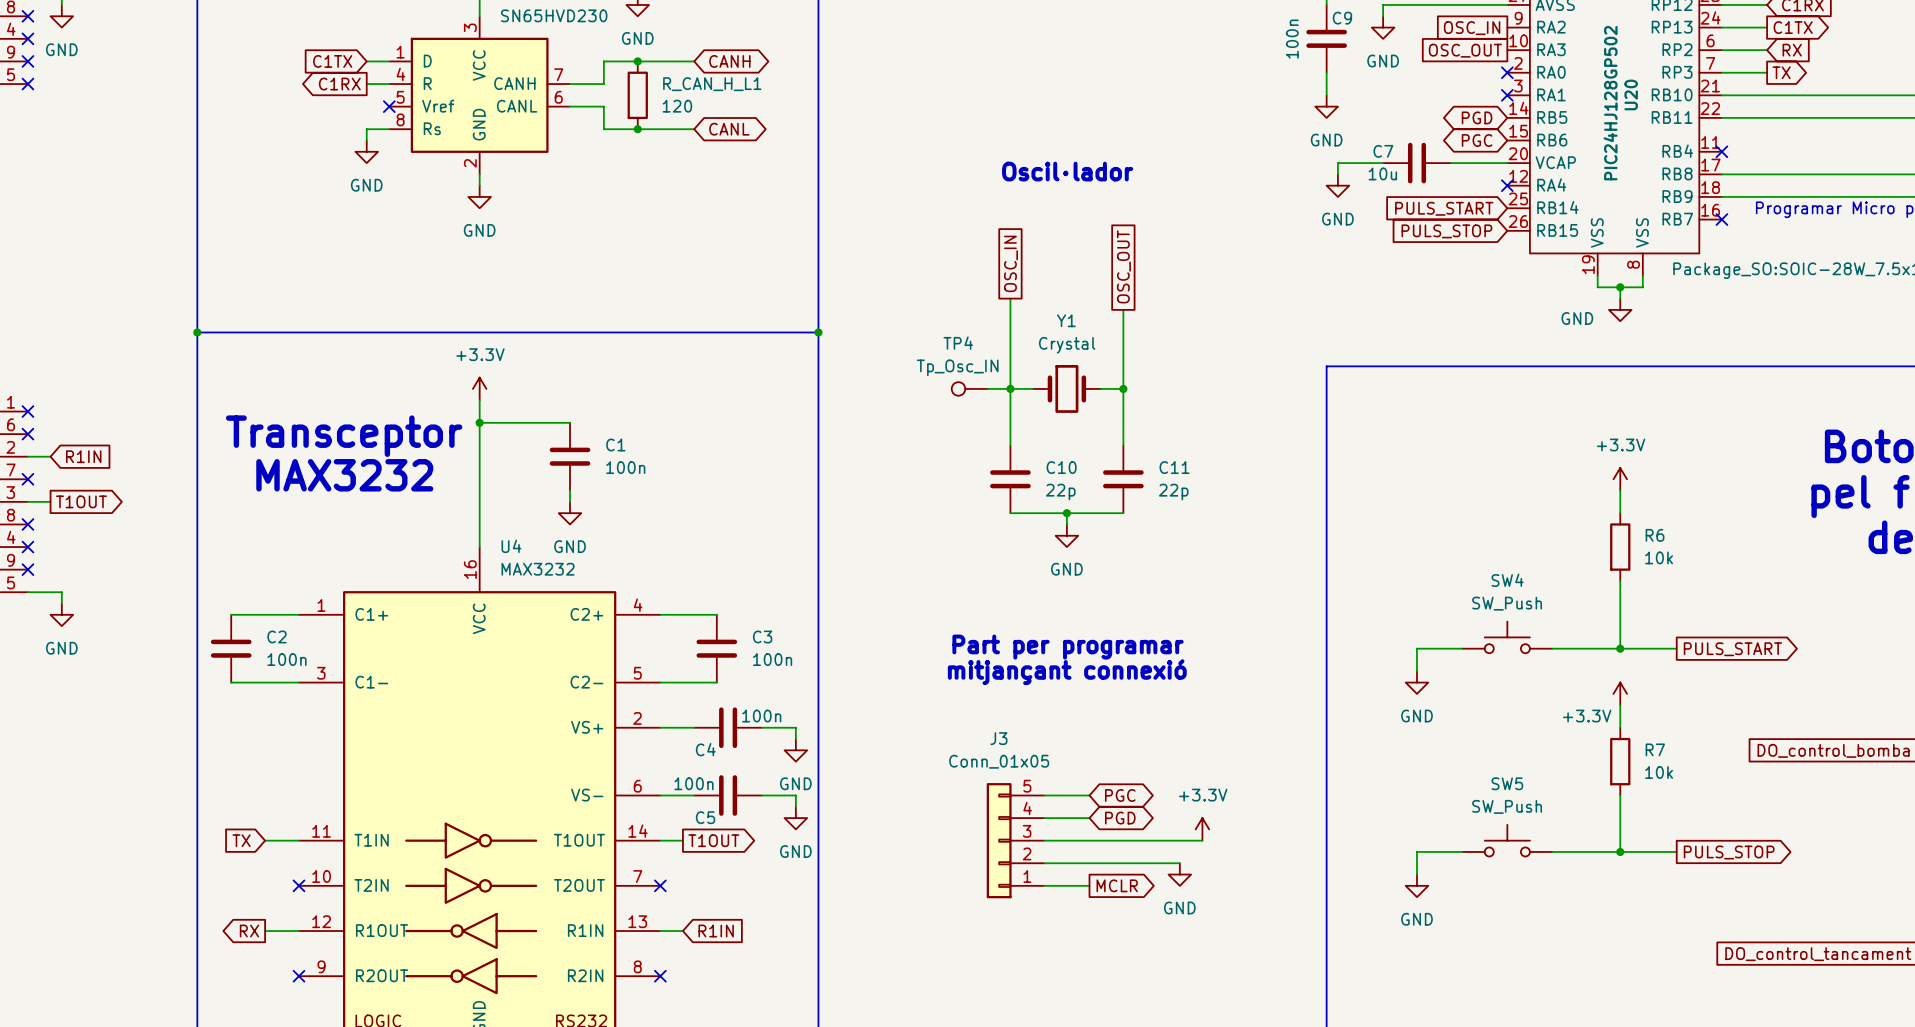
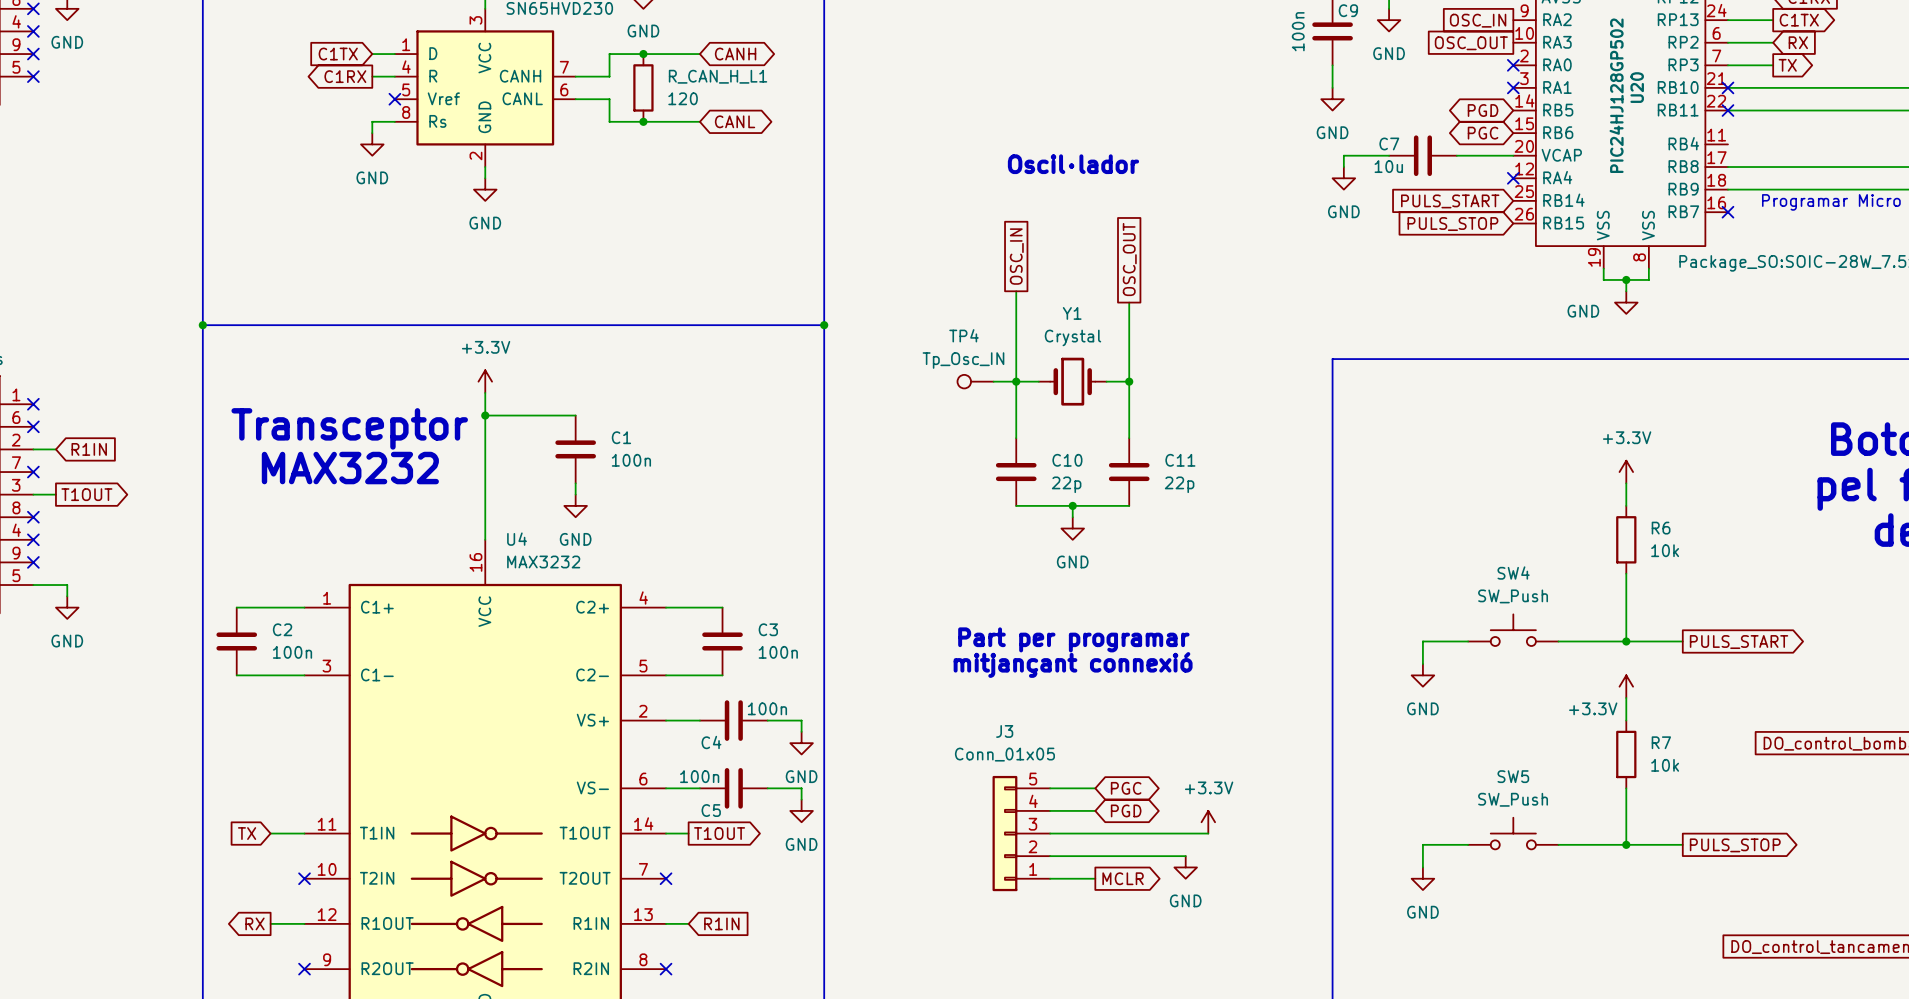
no-connect mark: none -> (1727, 87)
no-connect mark: none -> (1727, 110)
no-connect mark: (1721, 151) -> none

